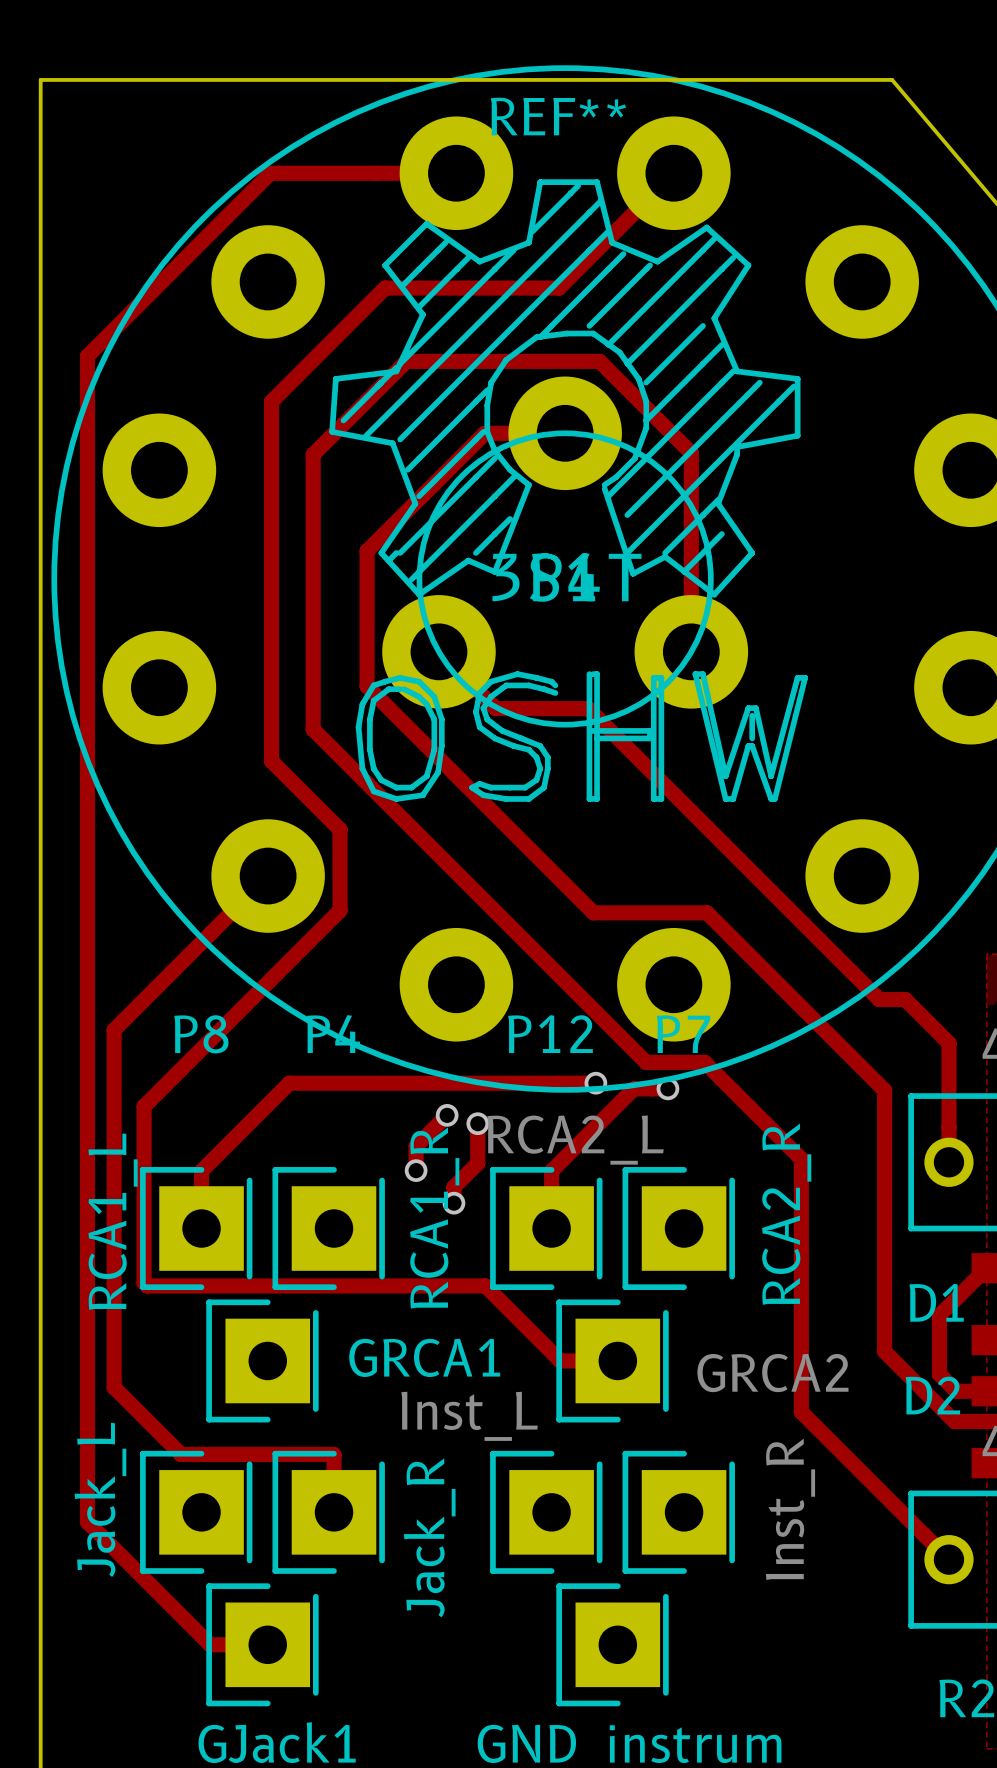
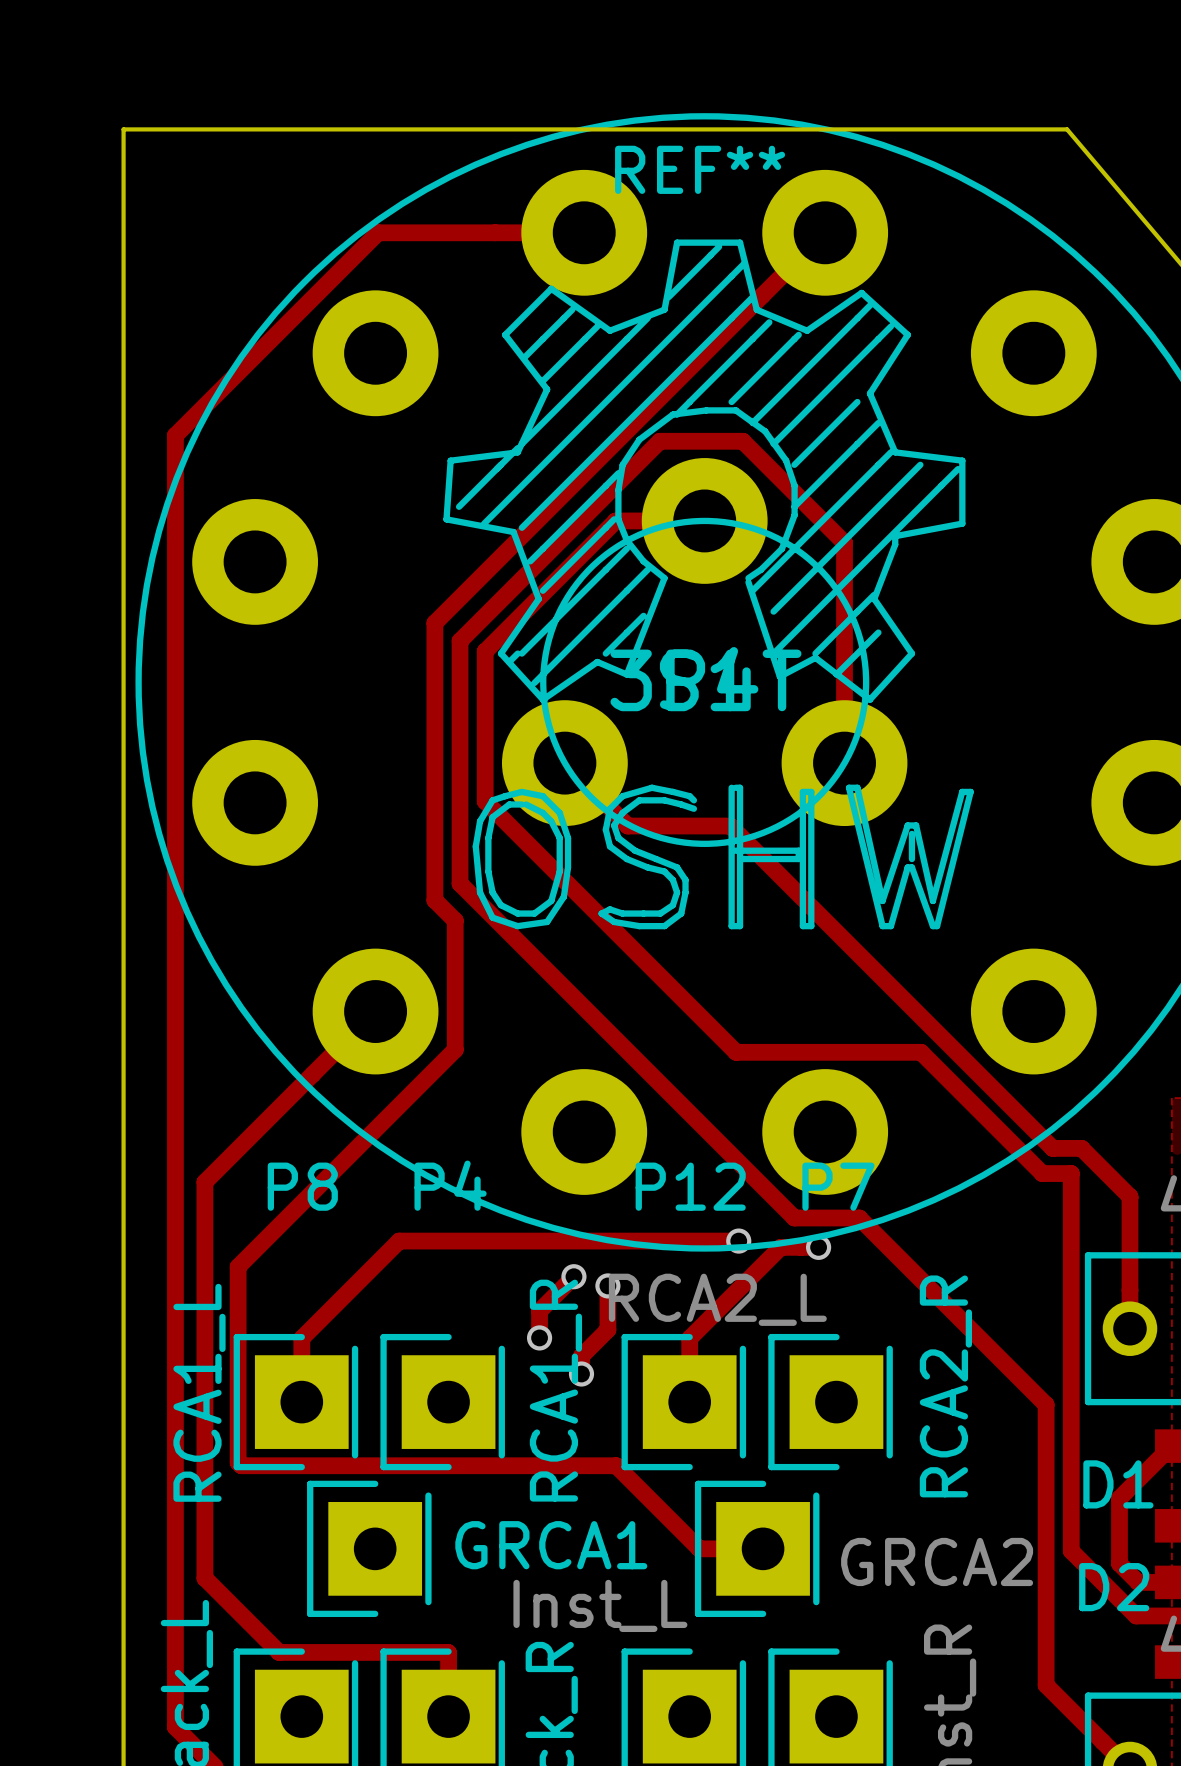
track: (559, 288) (385, 288) (271, 401) (271, 761) (340, 829) -> (697, 360) (434, 623) (434, 900) (455, 920) (455, 960)
track: (524, 361) (406, 361) (313, 454) (313, 729) (344, 760) -> (659, 441) (460, 641) (460, 883)
track: (707, 912) (884, 1090) (884, 1351) (895, 1362) -> (861, 1052) (921, 1052) (1042, 1173) (1071, 1173) (1071, 1551)
track: (801, 1159) (801, 1412) (873, 1483) -> (966, 1325) (1046, 1404) (1046, 1685)

